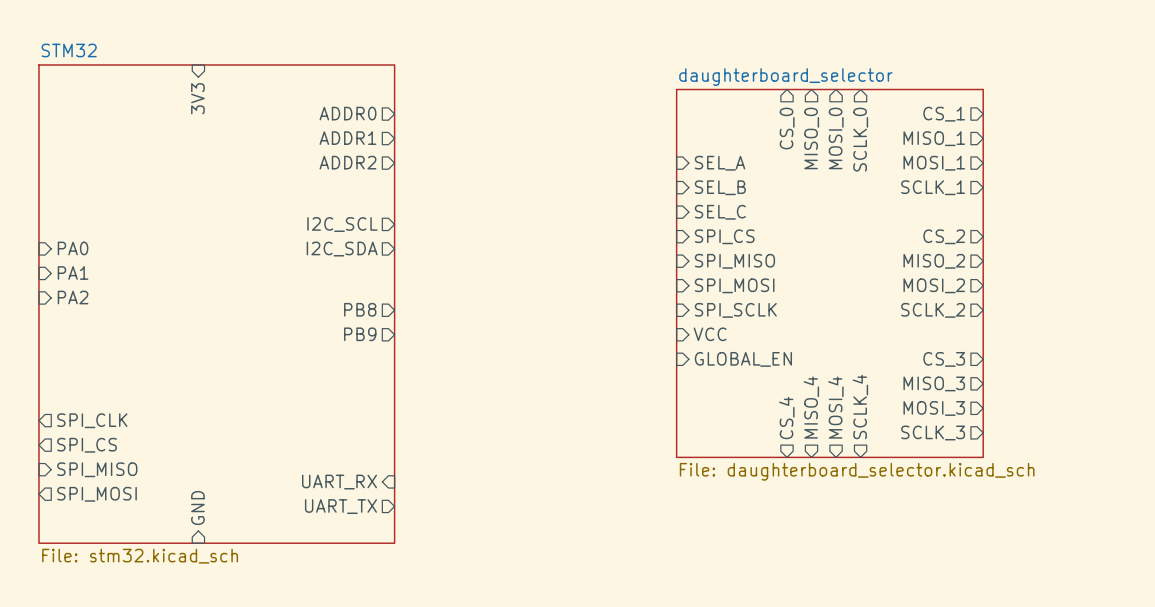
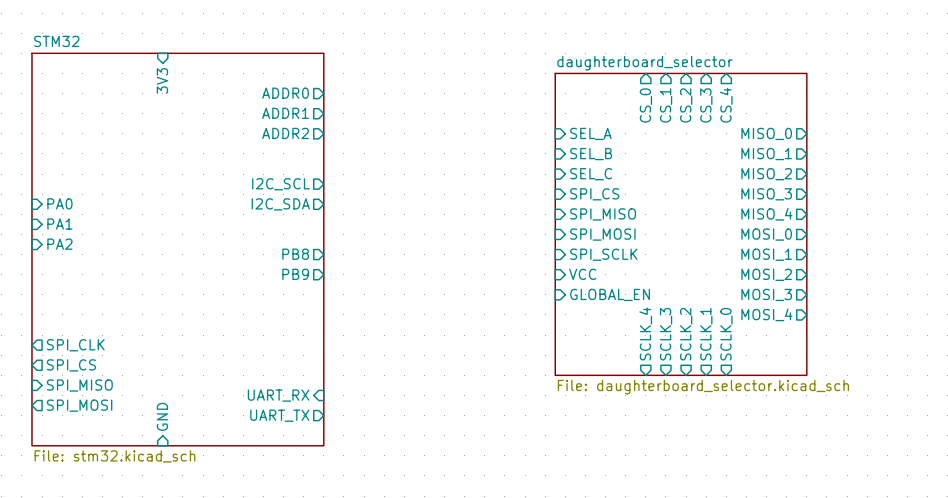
sheet pin: CS_1 (944, 114) -> none
sheet pin: none -> CS_4 (726, 105)
sheet pin: MISO_0 (811, 138) -> CS_1 (666, 105)
sheet pin: MOSI_0 (836, 138) -> CS_2 (686, 105)
sheet pin: MISO_1 (934, 138) -> none
sheet pin: SCLK_0 (860, 139) -> CS_3 (706, 105)
sheet pin: MOSI_1 (934, 163) -> MISO_0 (766, 133)
sheet pin: SCLK_1 (933, 187) -> MISO_1 (766, 154)
sheet pin: none -> MISO_2 (766, 174)
sheet pin: CS_2 (944, 236) -> MISO_3 (766, 194)
sheet pin: MISO_2 (934, 261) -> MISO_4 (766, 214)
sheet pin: MOSI_2 (934, 285) -> MOSI_0 (766, 234)
sheet pin: SCLK_2 (933, 310) -> MOSI_1 (766, 254)
sheet pin: none -> MOSI_2 (766, 274)
sheet pin: CS_3 (944, 359) -> MOSI_3 (766, 294)
sheet pin: MISO_3 (934, 383) -> MOSI_4 (766, 314)
sheet pin: SCLK_4 (860, 406) -> SCLK_1 (706, 334)
sheet pin: MISO_4 (811, 407) -> SCLK_3 (666, 334)
sheet pin: MOSI_4 (835, 407) -> SCLK_2 (686, 334)
sheet pin: MOSI_3 (934, 408) -> none
sheet pin: CS_4 (786, 418) -> SCLK_4 (645, 333)
sheet pin: SCLK_3 (933, 432) -> SCLK_0 (726, 334)

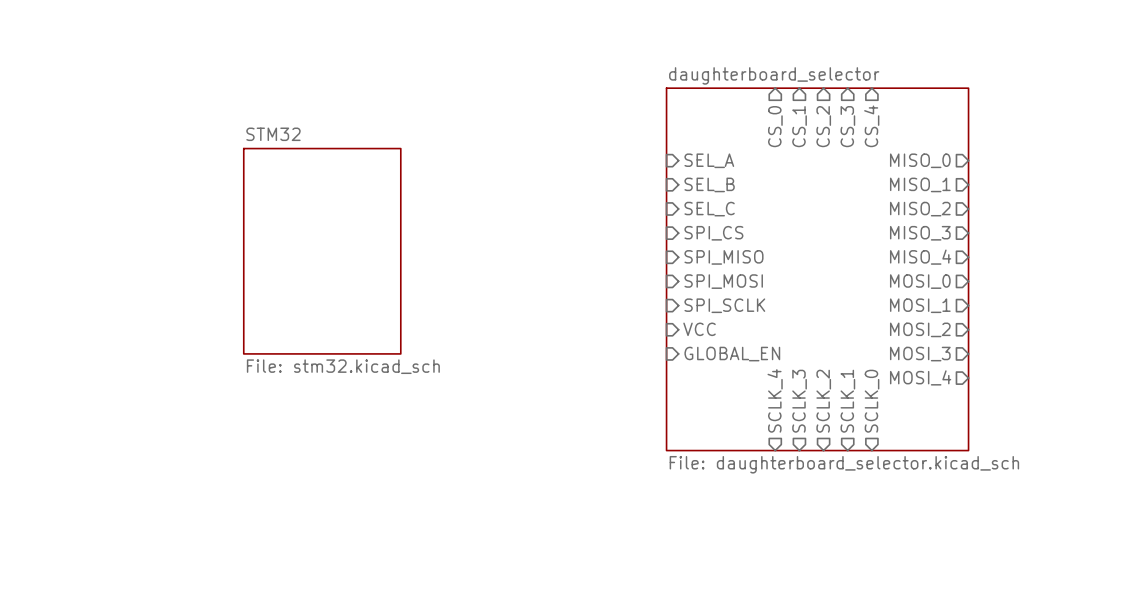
sheet STM32 name position: STM32 (56, 41) -> STM32 (273, 134)
sheet STM32 shape: [31, 52, 325, 447] -> [243, 147, 402, 355]
sheet pin: 3V3 (162, 81) -> none
sheet pin: ADDR0 (285, 93) -> none
sheet pin: ADDR1 (285, 113) -> none
sheet pin: ADDR2 (285, 133) -> none
sheet pin: I2C_SCL (281, 184) -> none
sheet pin: PA0 (59, 203) -> none
sheet pin: I2C_SDA (280, 204) -> none
sheet pin: PA1 (59, 224) -> none
sheet pin: PA2 (59, 244) -> none
sheet pin: PB8 (295, 254) -> none
sheet pin: PB9 (295, 274) -> none
sheet pin: SPI_CLK (75, 345) -> none
sheet pin: SPI_CS (71, 365) -> none
sheet pin: SPI_MISO (79, 385) -> none
sheet pin: UART_RX (278, 395) -> none
sheet pin: SPI_MOSI (79, 405) -> none
sheet pin: UART_TX (279, 415) -> none
sheet pin: GND (162, 416) -> none
sheet STM32 value position: File: stm32.kicad_sch (114, 456) -> File: stm32.kicad_sch (343, 366)

